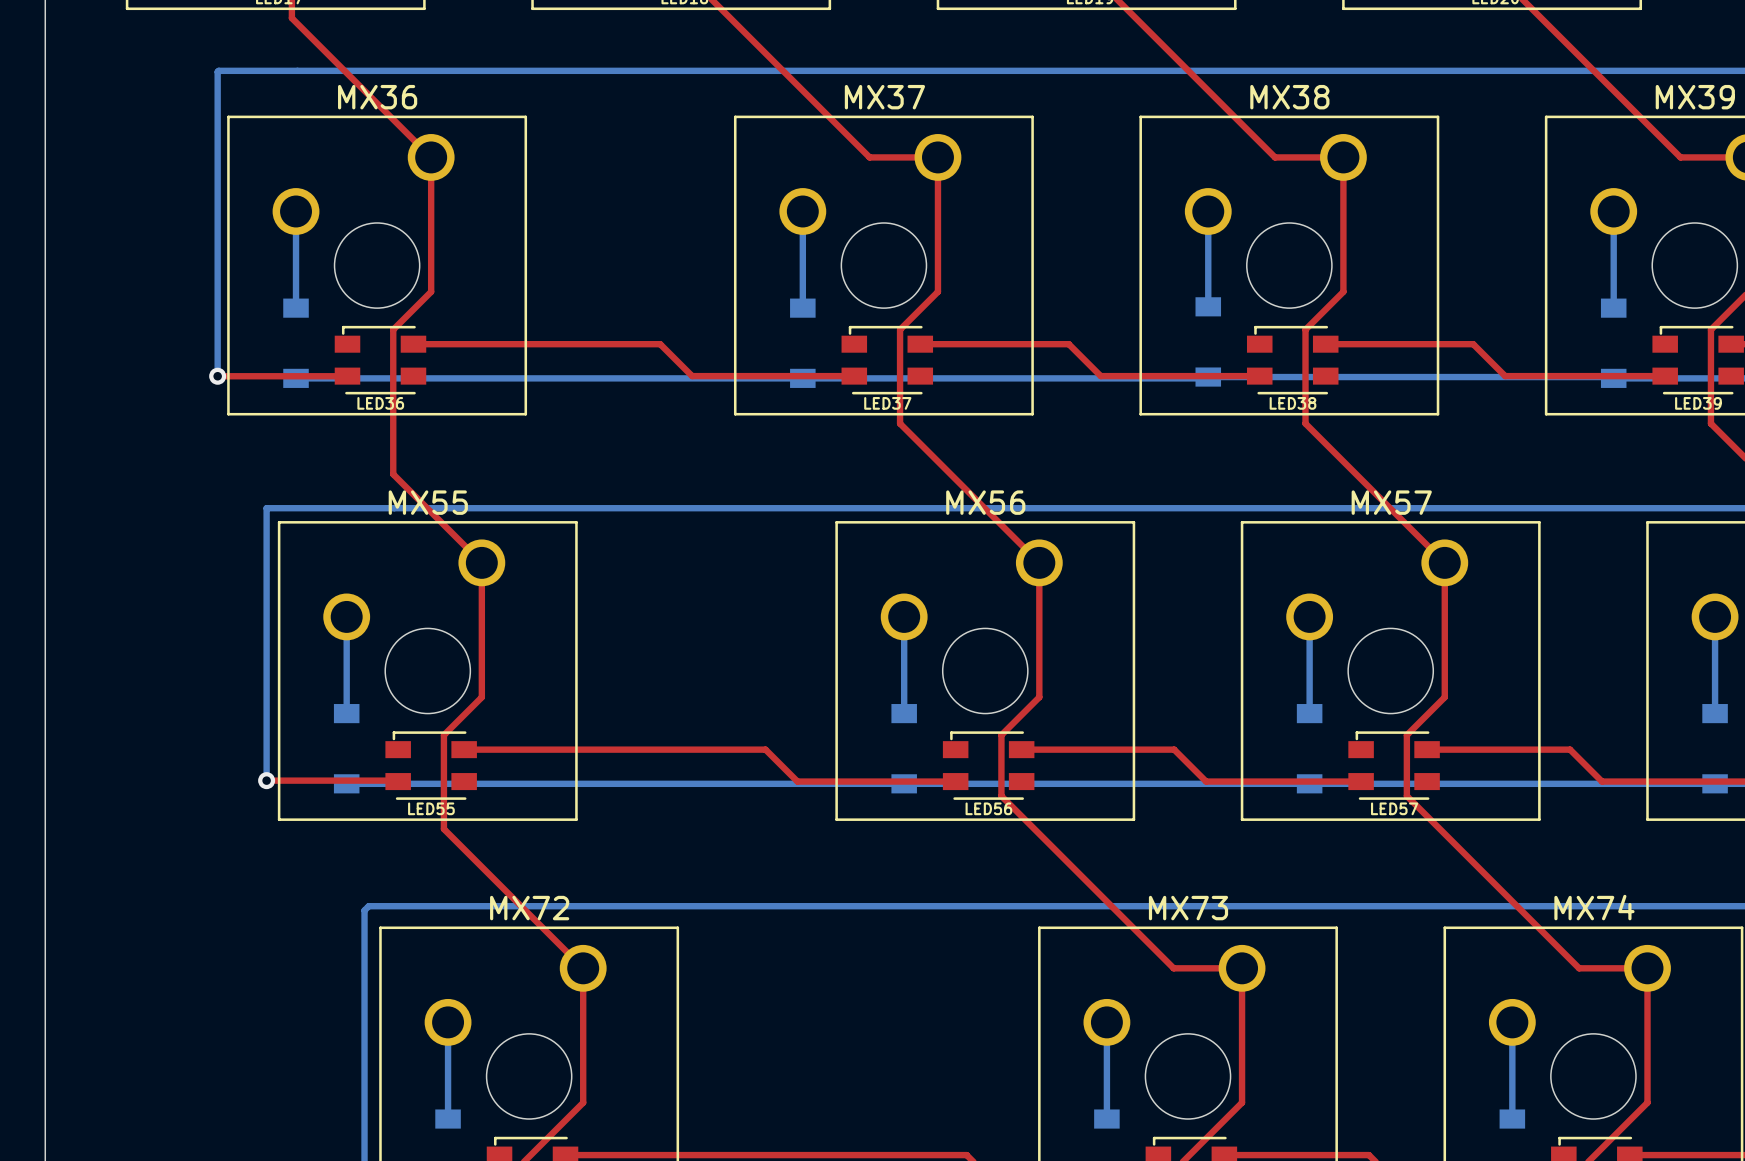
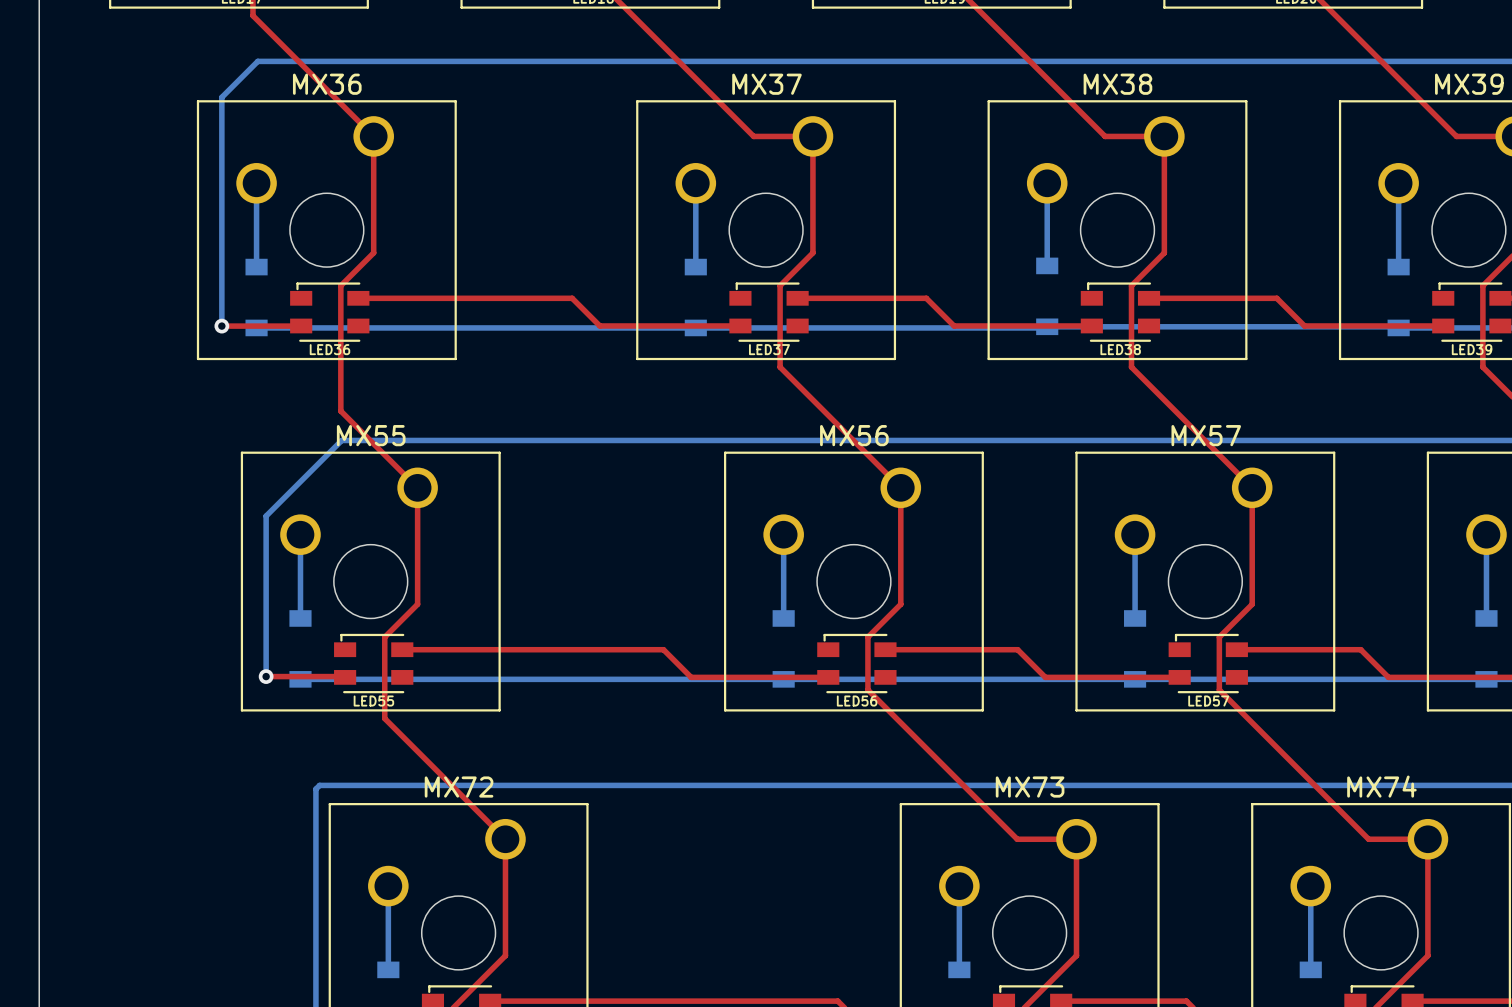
bottom track: (297, 70) (217, 71) (217, 376) -> (257, 61) (221, 97) (221, 326)
top track: (217, 376) (255, 376) -> none
via position: (217, 376) -> (221, 326)
bottom track: (394, 508) (266, 508) (266, 780) -> (341, 440) (266, 516) (266, 676)
top track: (266, 780) (307, 780) -> none
via position: (266, 780) -> (266, 676)

